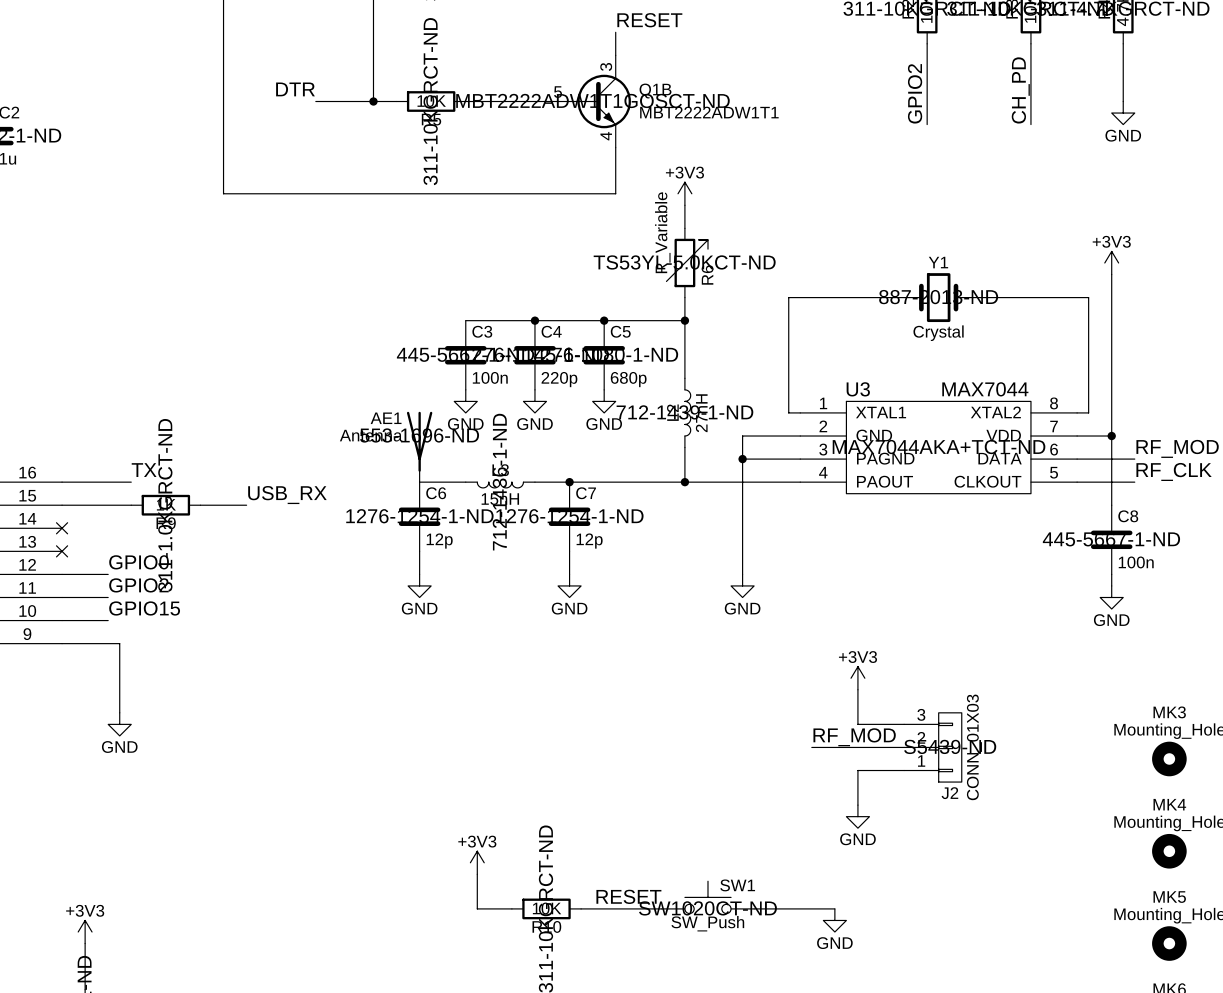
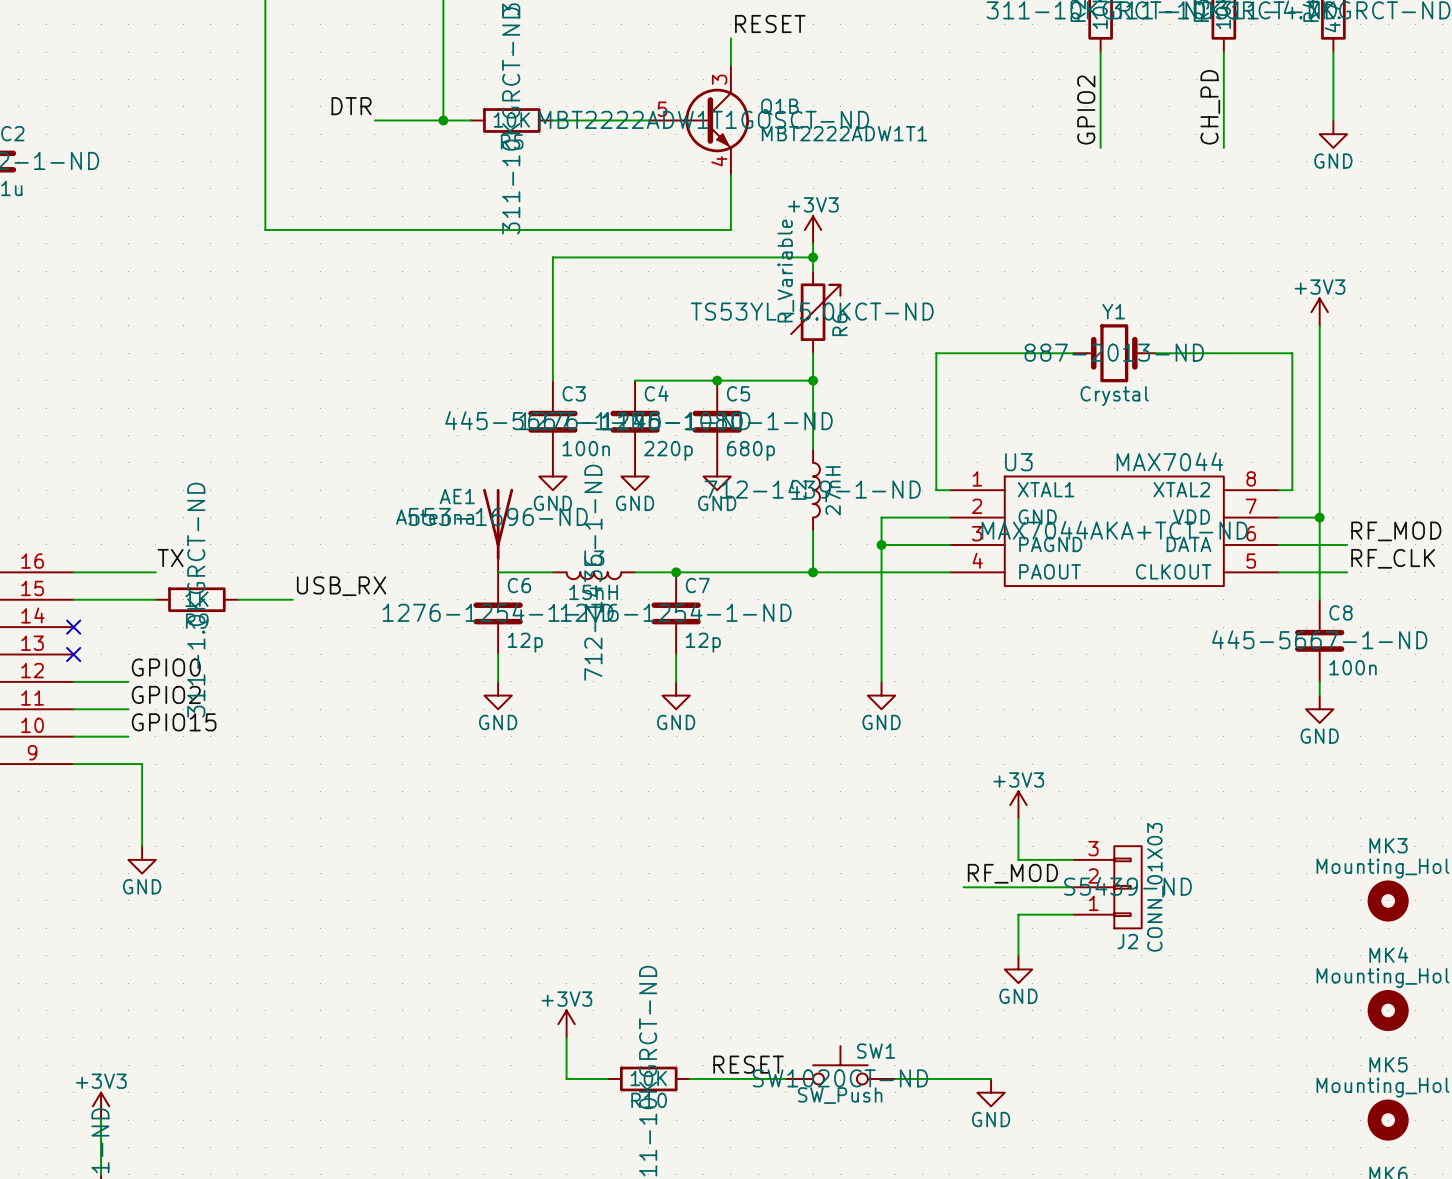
junction: none -> (813, 257)
wire: (465, 320) (534, 320) -> (552, 380) (552, 257) (813, 257)
junction: (534, 320) -> none

